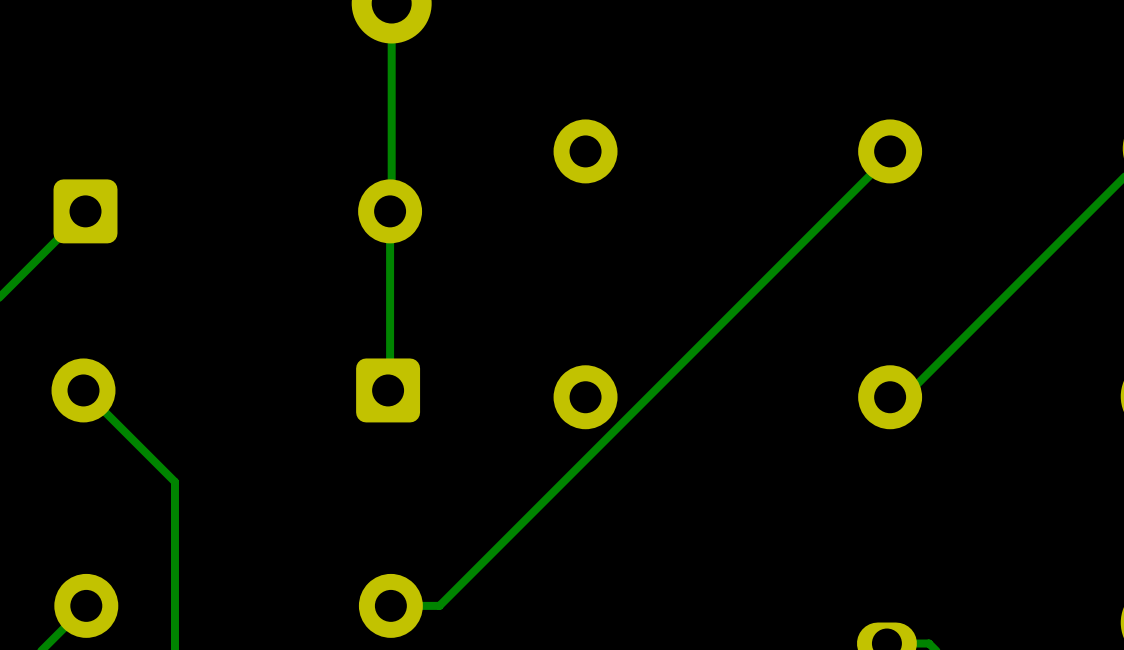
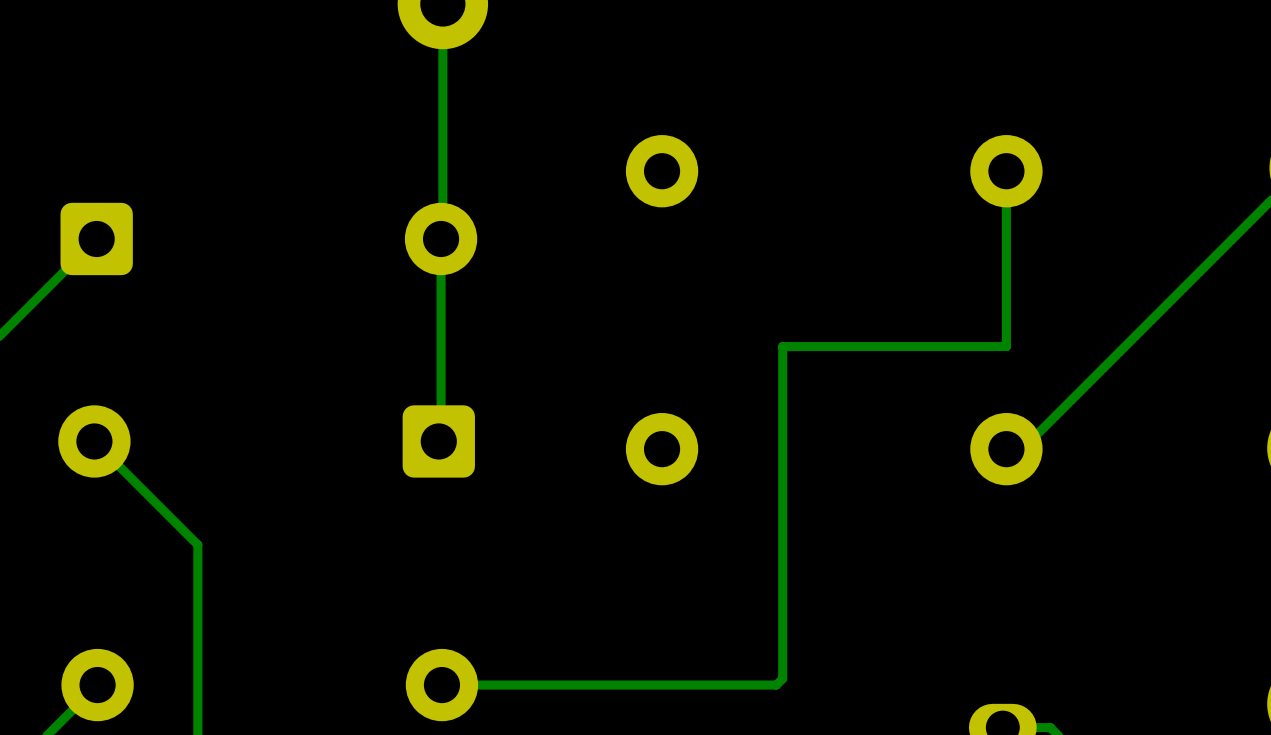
track: (890, 155) (439, 605) -> (1006, 175) (1006, 346) (782, 346) (782, 678) (776, 685) (496, 685)

